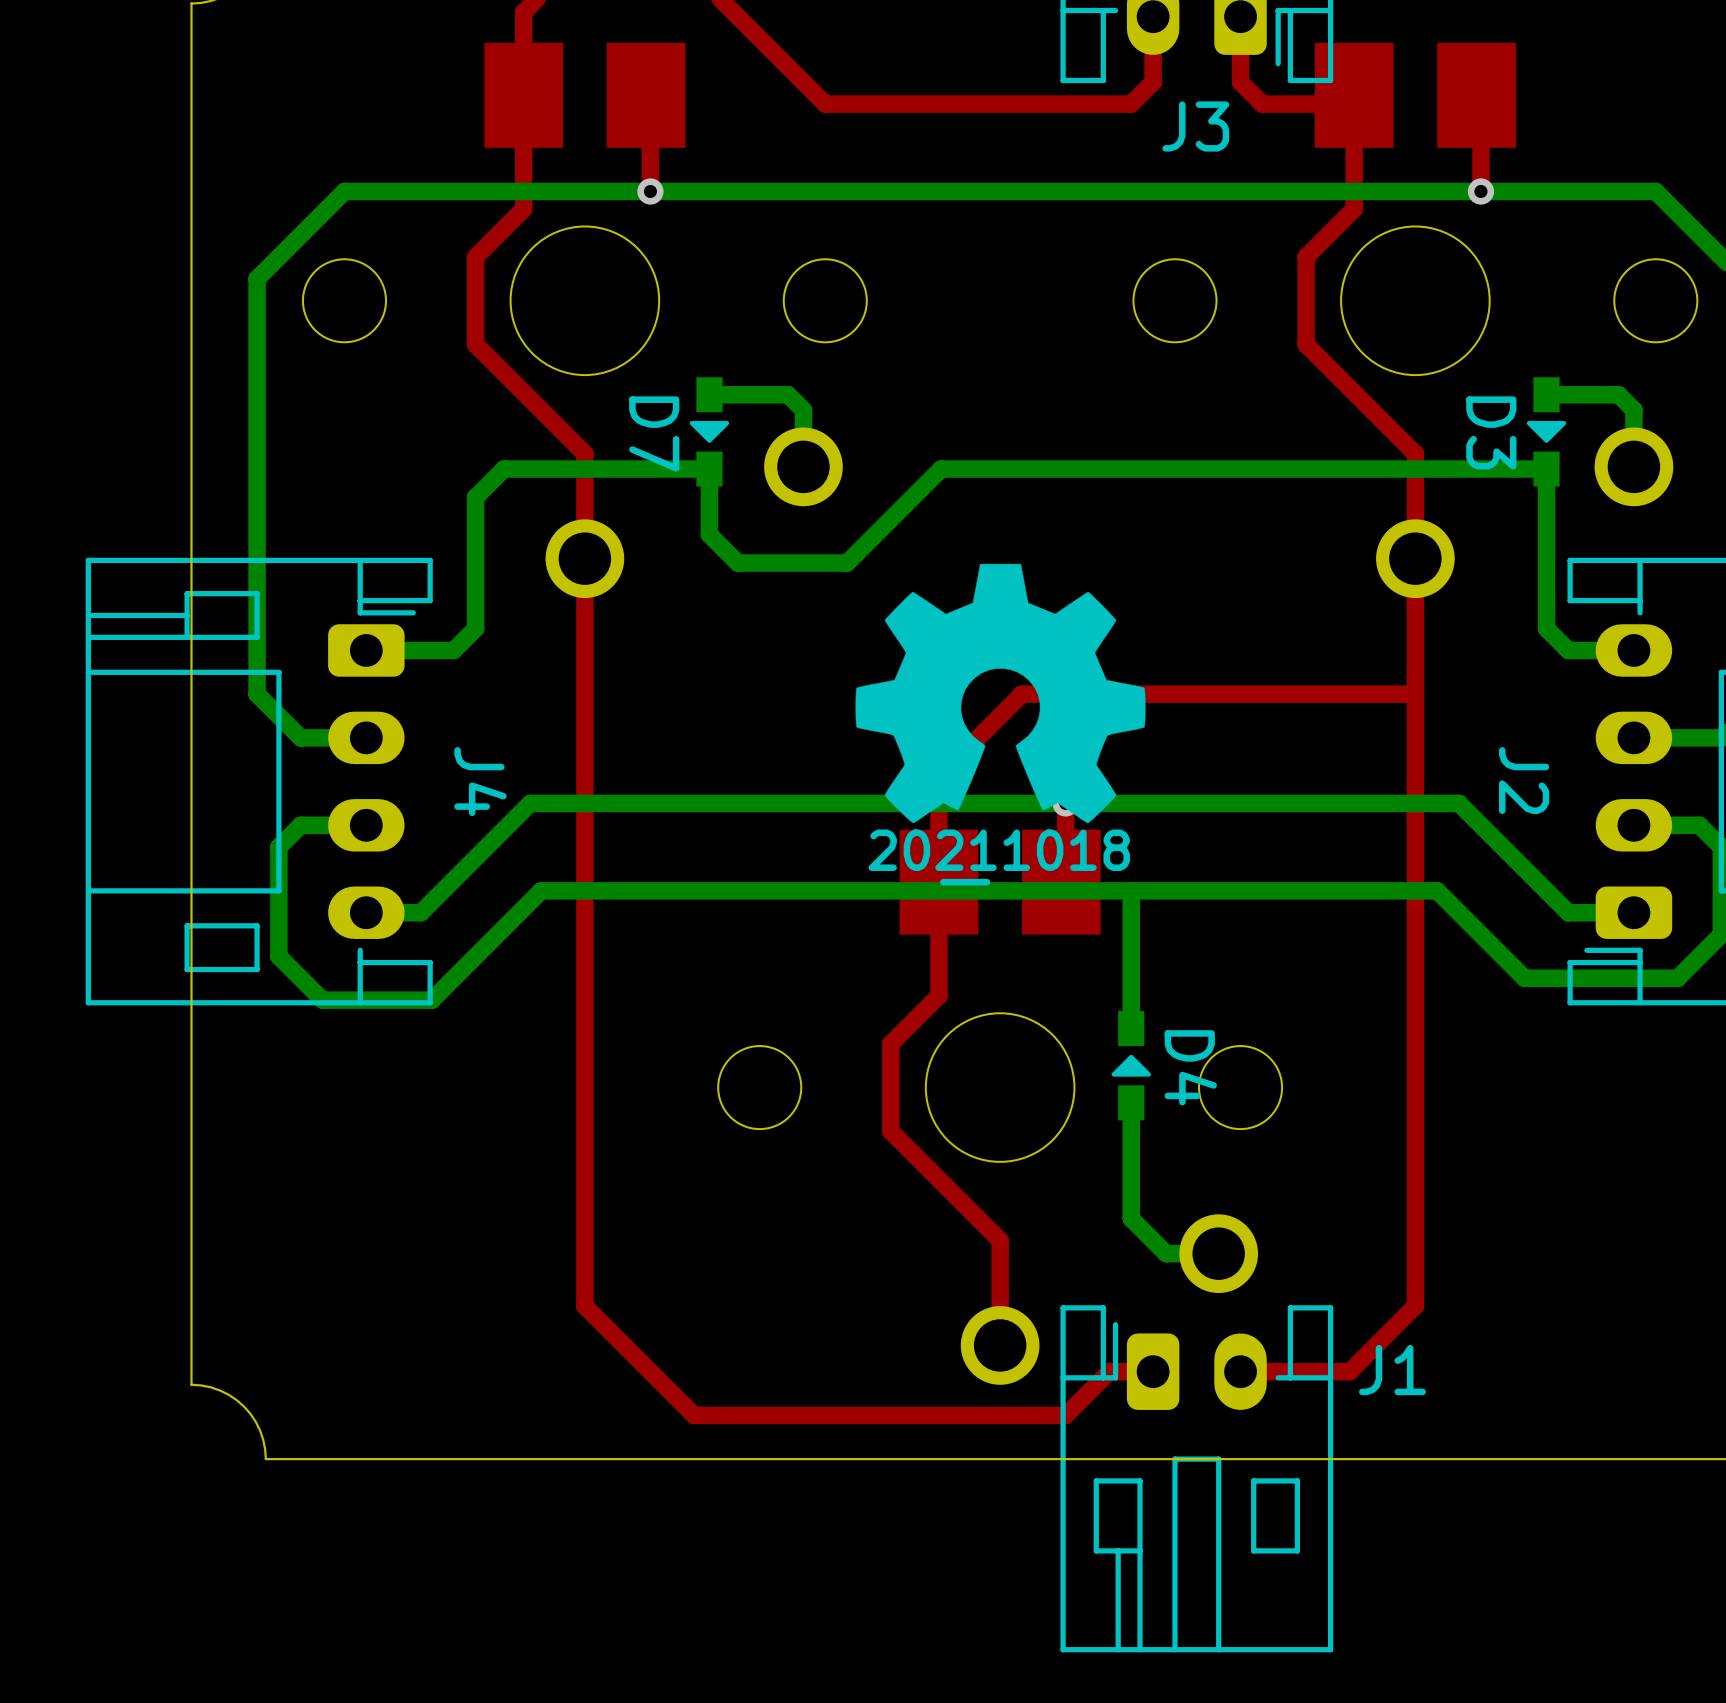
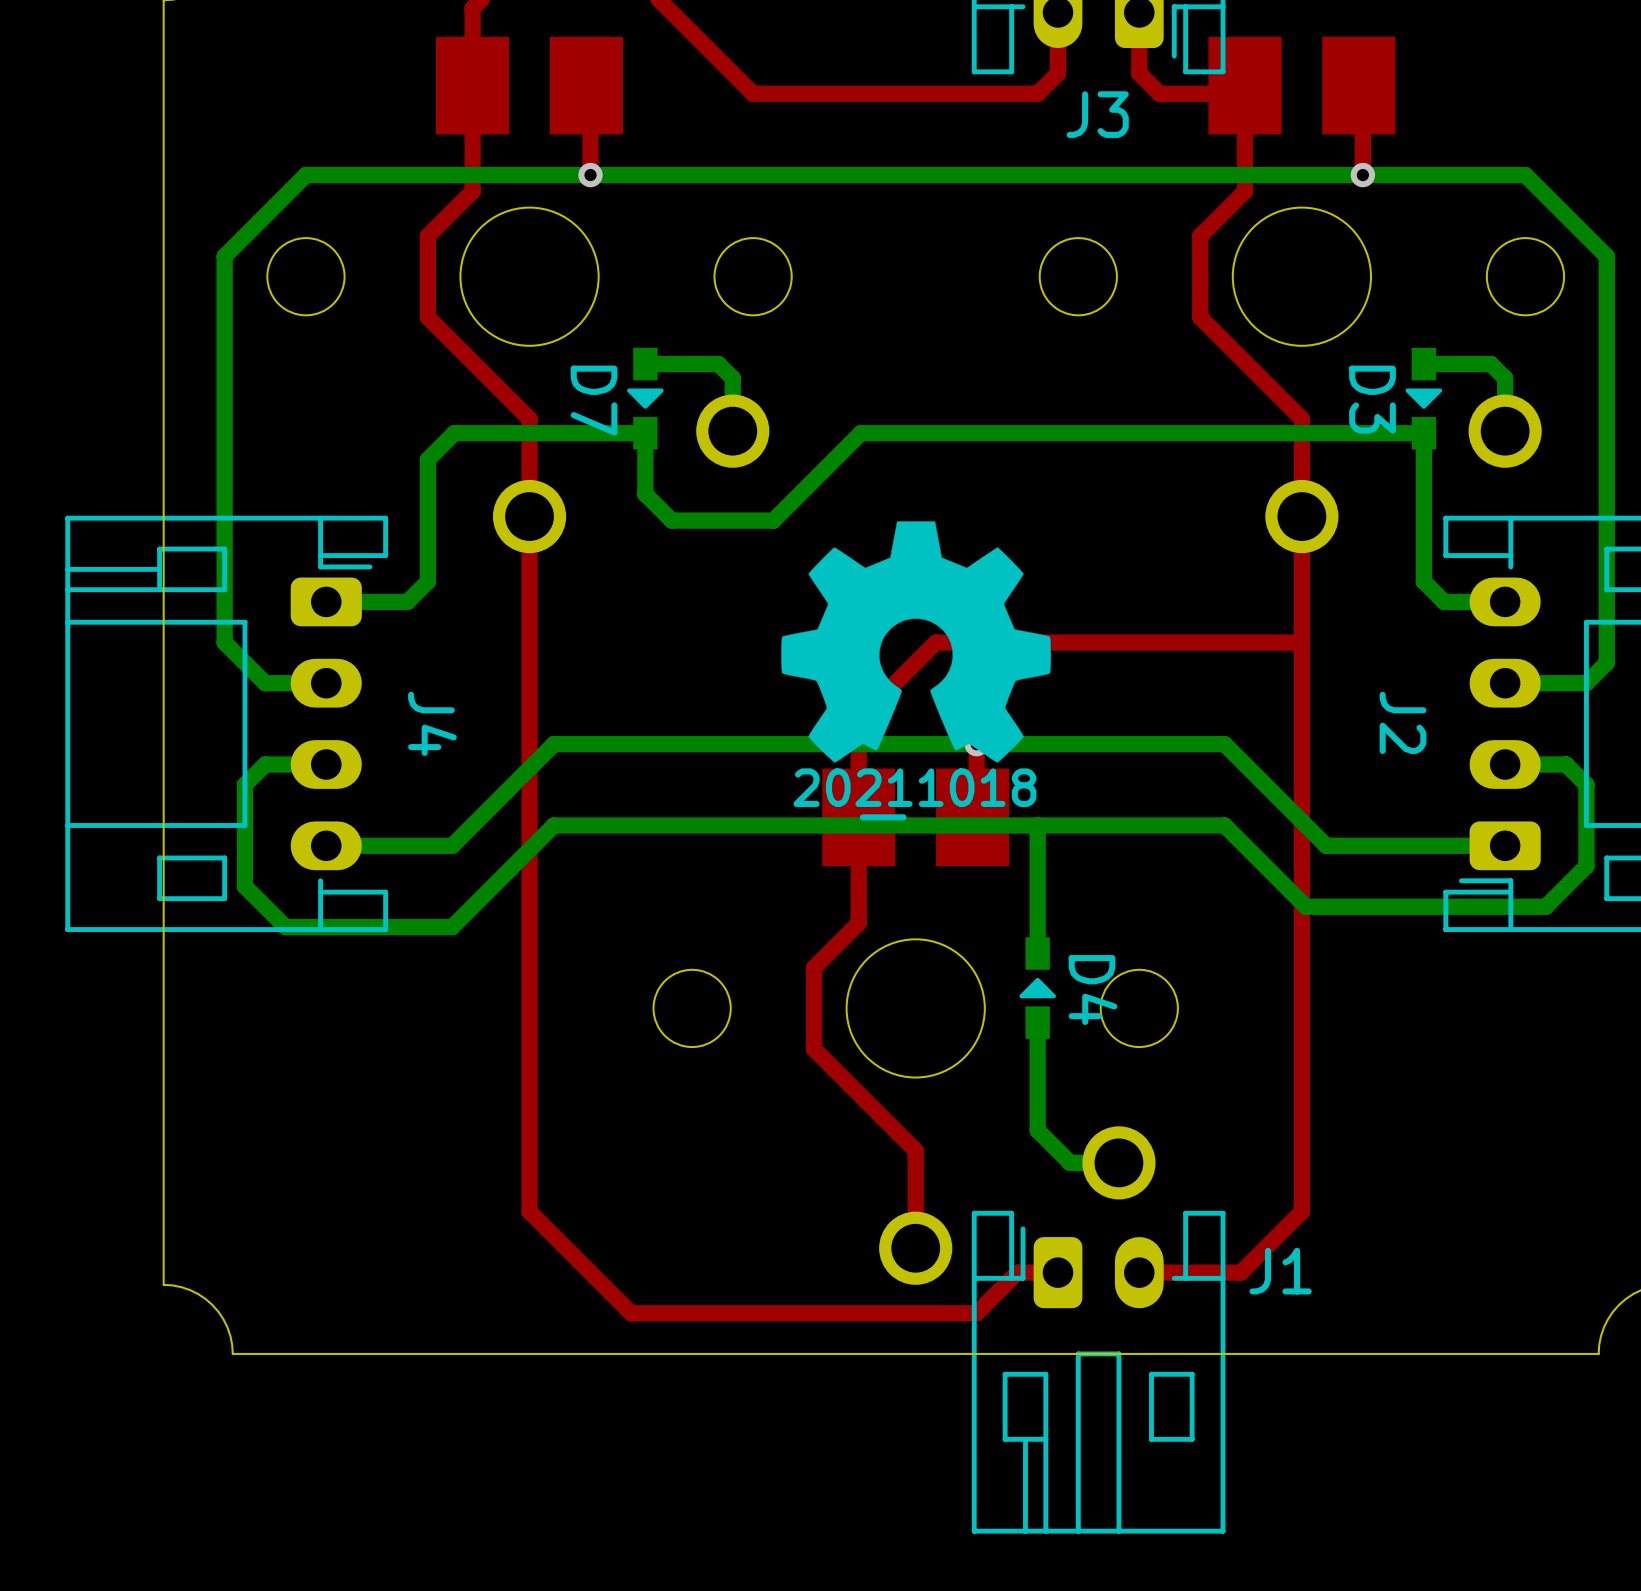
bottom track: (611, 803) (530, 803) (420, 912) -> (553, 744) (452, 845) (377, 845)
bottom track: (1332, 803) (1459, 803) (1568, 912) -> (1224, 744) (1326, 845) (1444, 845)
bottom track: (611, 890) (541, 890) (431, 1000) -> (553, 825) (452, 927) (387, 927)
bottom track: (1332, 890) (1437, 890) (1524, 978) -> (1224, 825) (1305, 906) (1403, 906)

